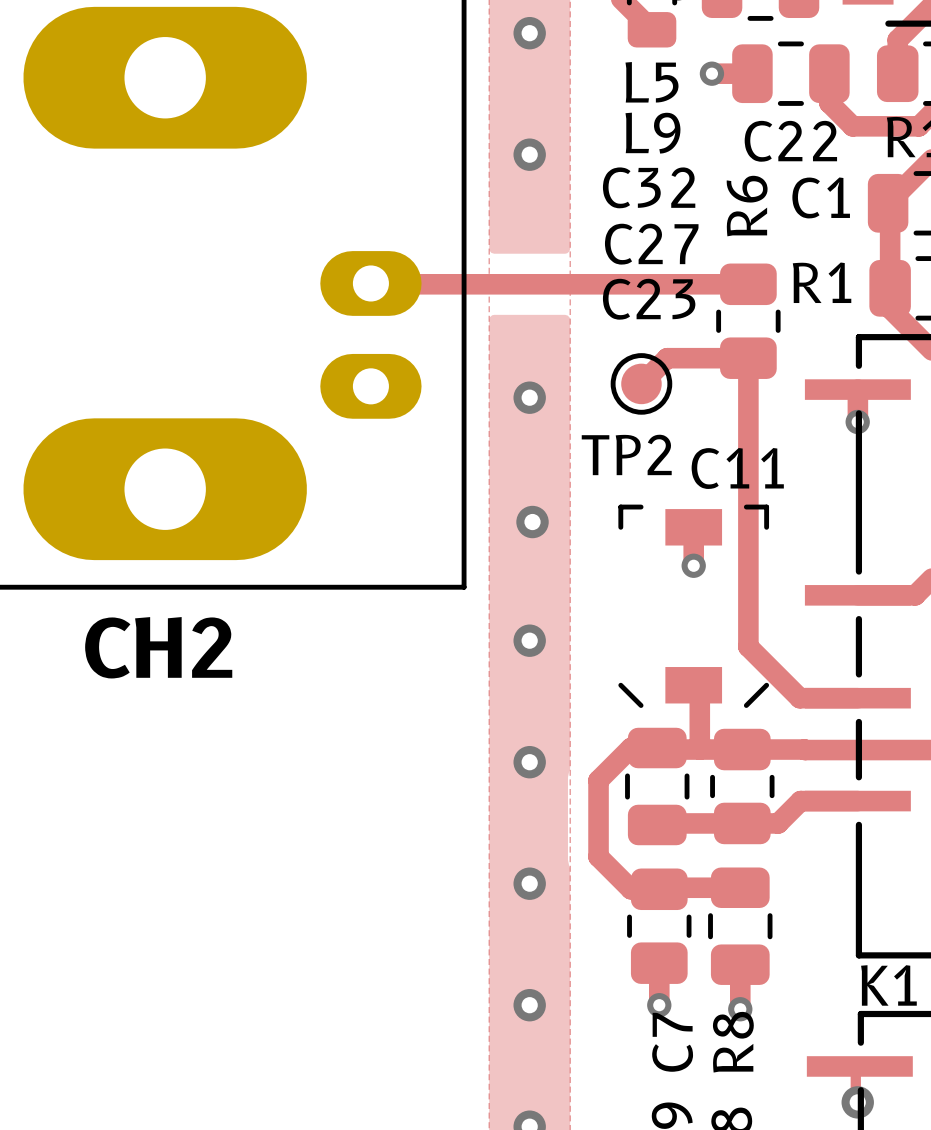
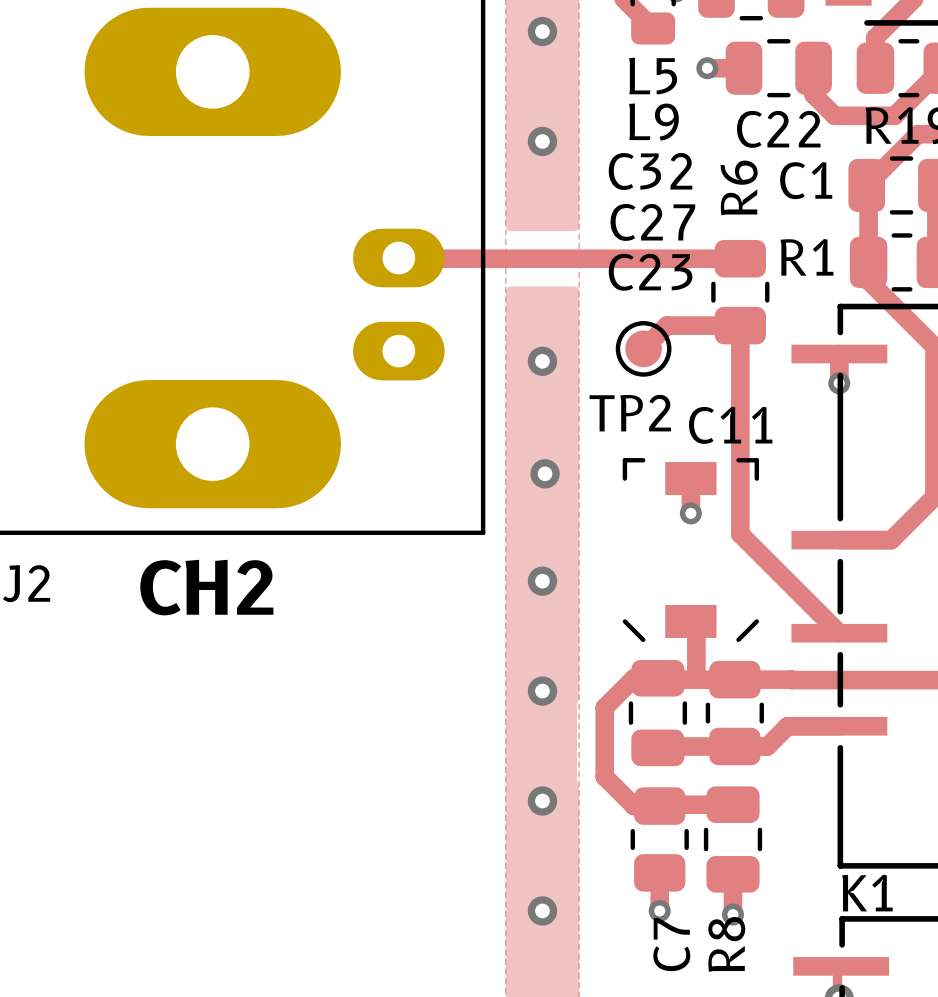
track: (748, 588) (748, 646) (799, 698) (857, 698) -> (740, 534) (839, 633)

